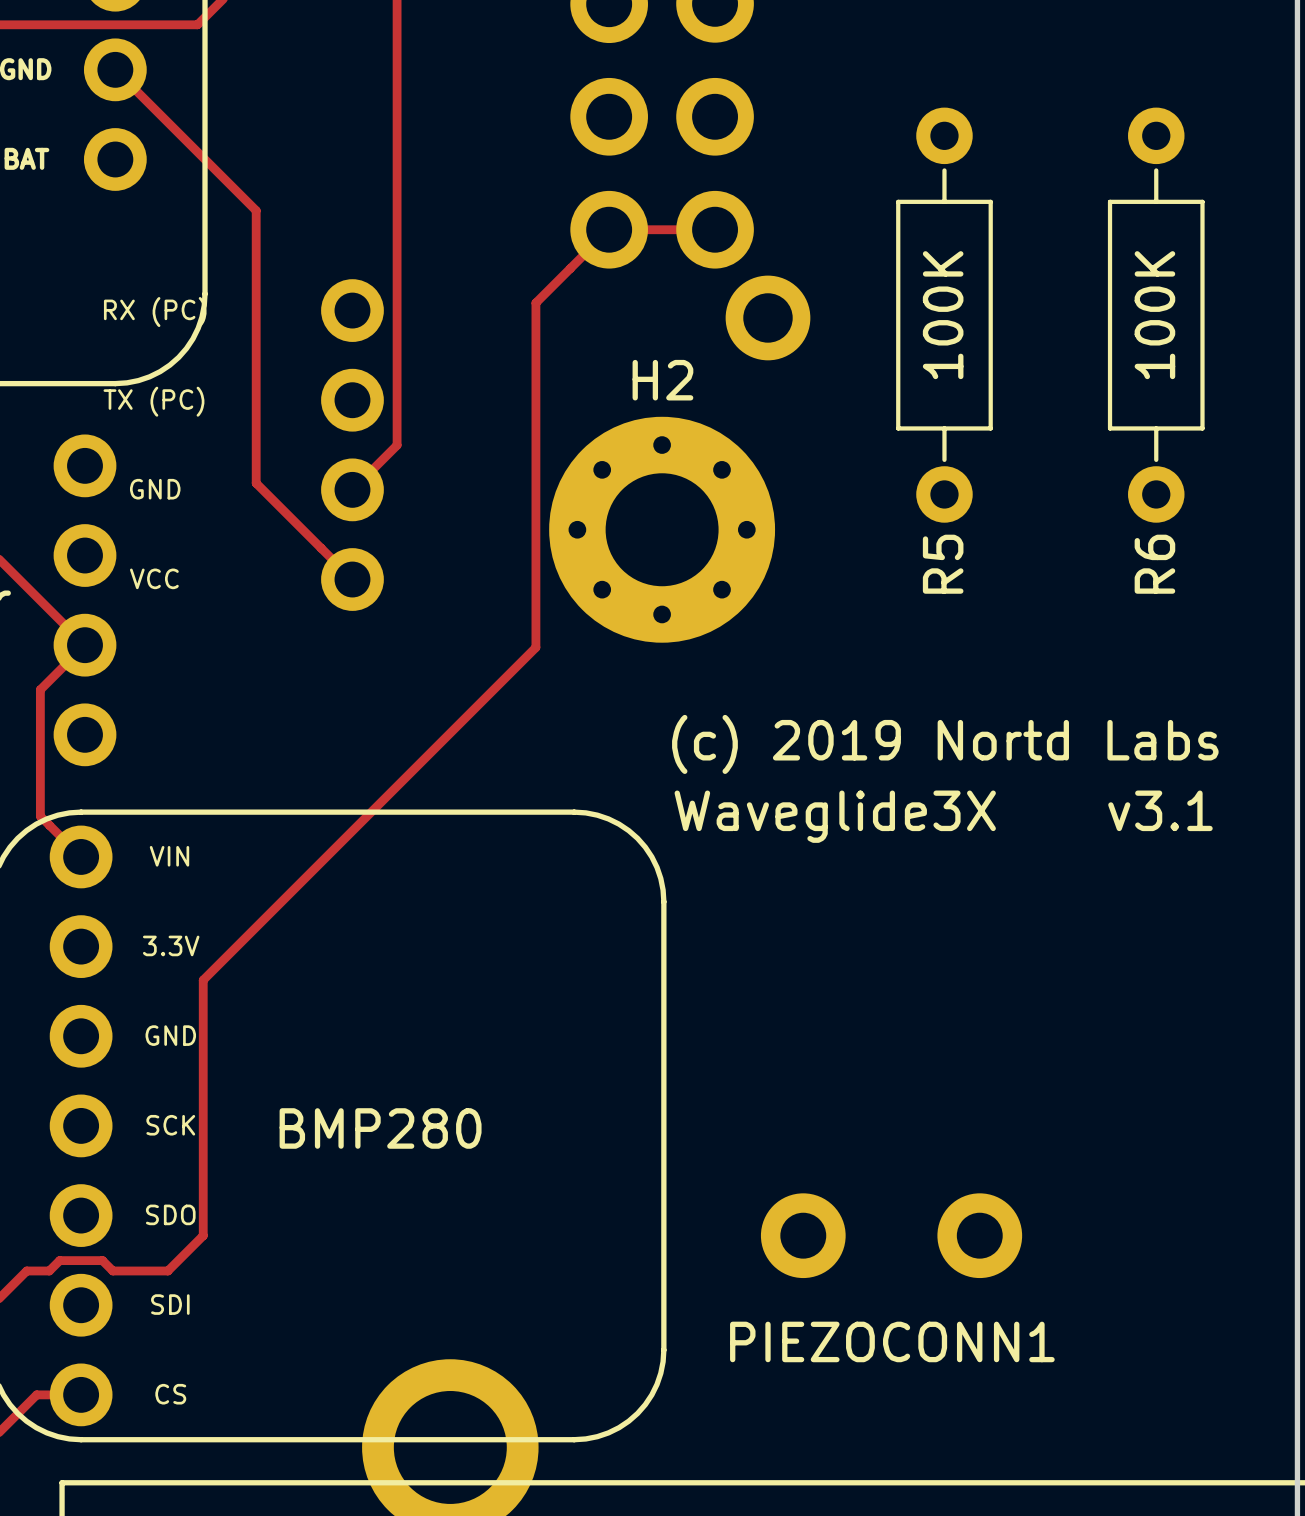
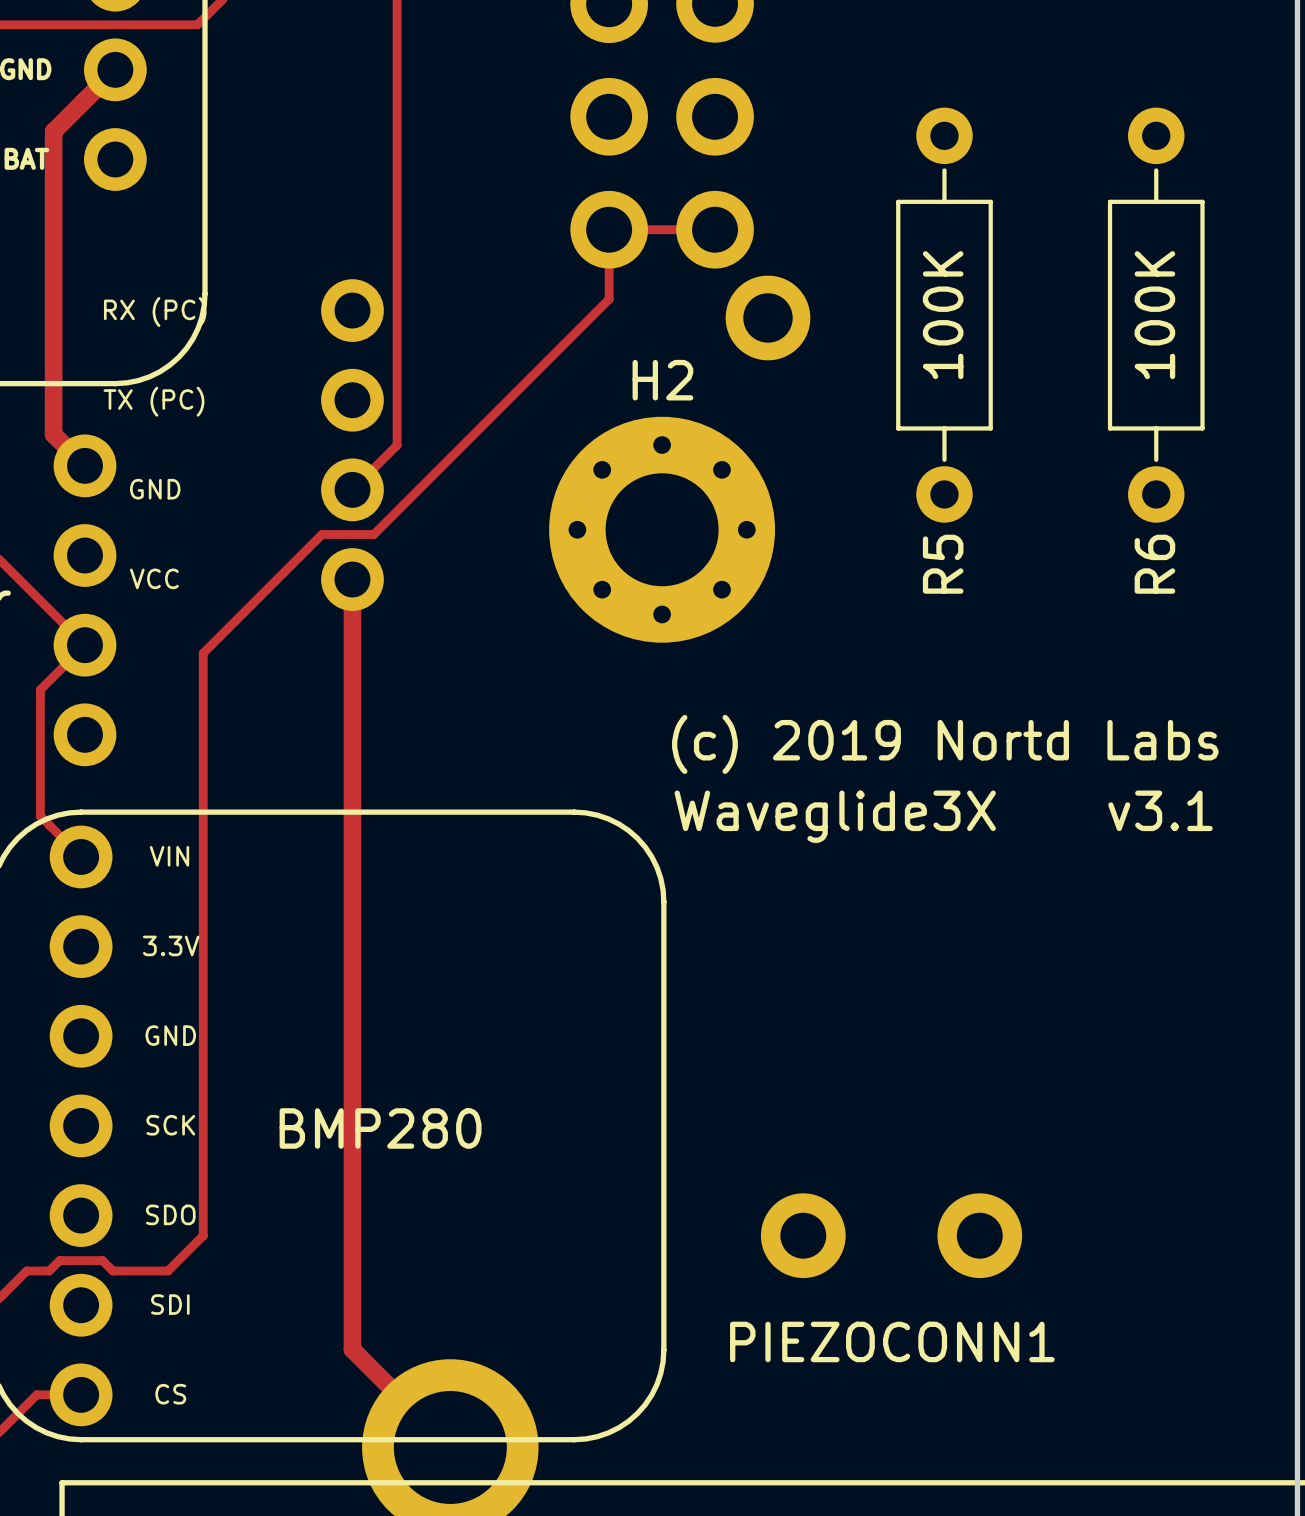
track: (115, 69) (256, 210) (256, 483) (352, 579) -> (115, 69) (53, 131) (53, 434) (85, 465)
track: (609, 229) (535, 302) (535, 647) (203, 980) -> (609, 229) (609, 299) (373, 534) (322, 534) (203, 653) (203, 980)
track: none -> (352, 579) (352, 1349) (450, 1447)

